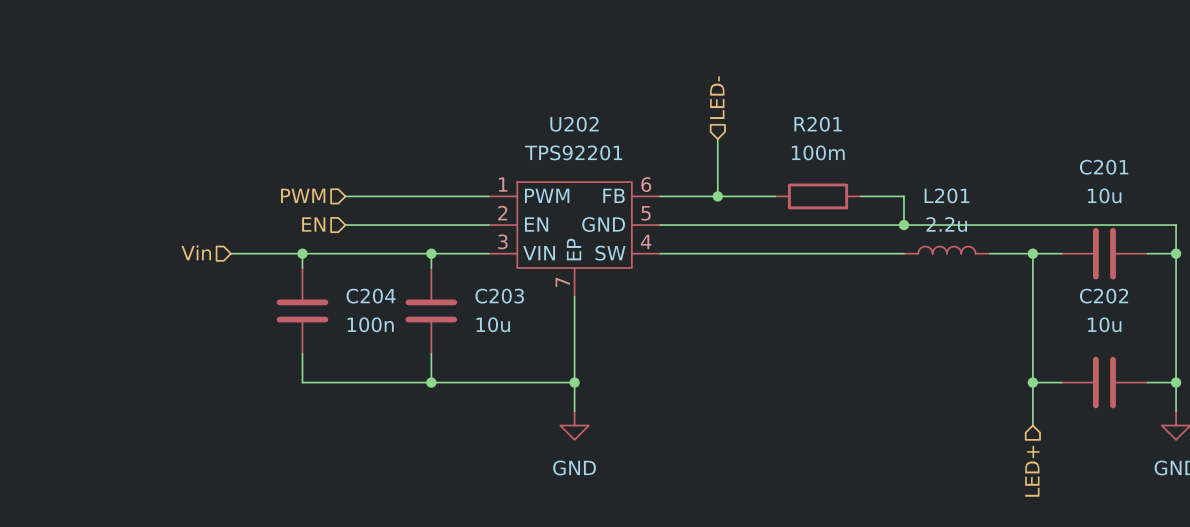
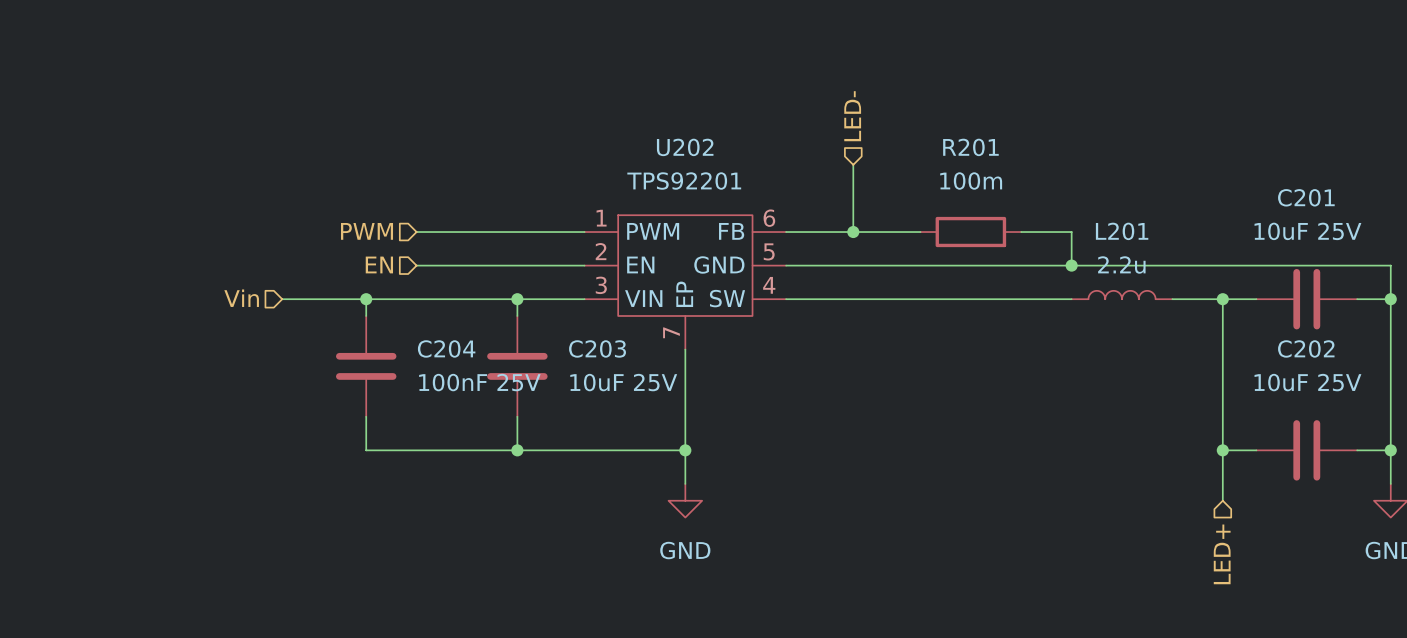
C201 value: 10u (1104, 195) -> 10uF 25V (1307, 231)
C204 value: 100n (370, 324) -> 100nF 25V (479, 382)
C203 value: 10u (493, 324) -> 10uF 25V (623, 382)
C202 value: 10u (1104, 324) -> 10uF 25V (1307, 382)

